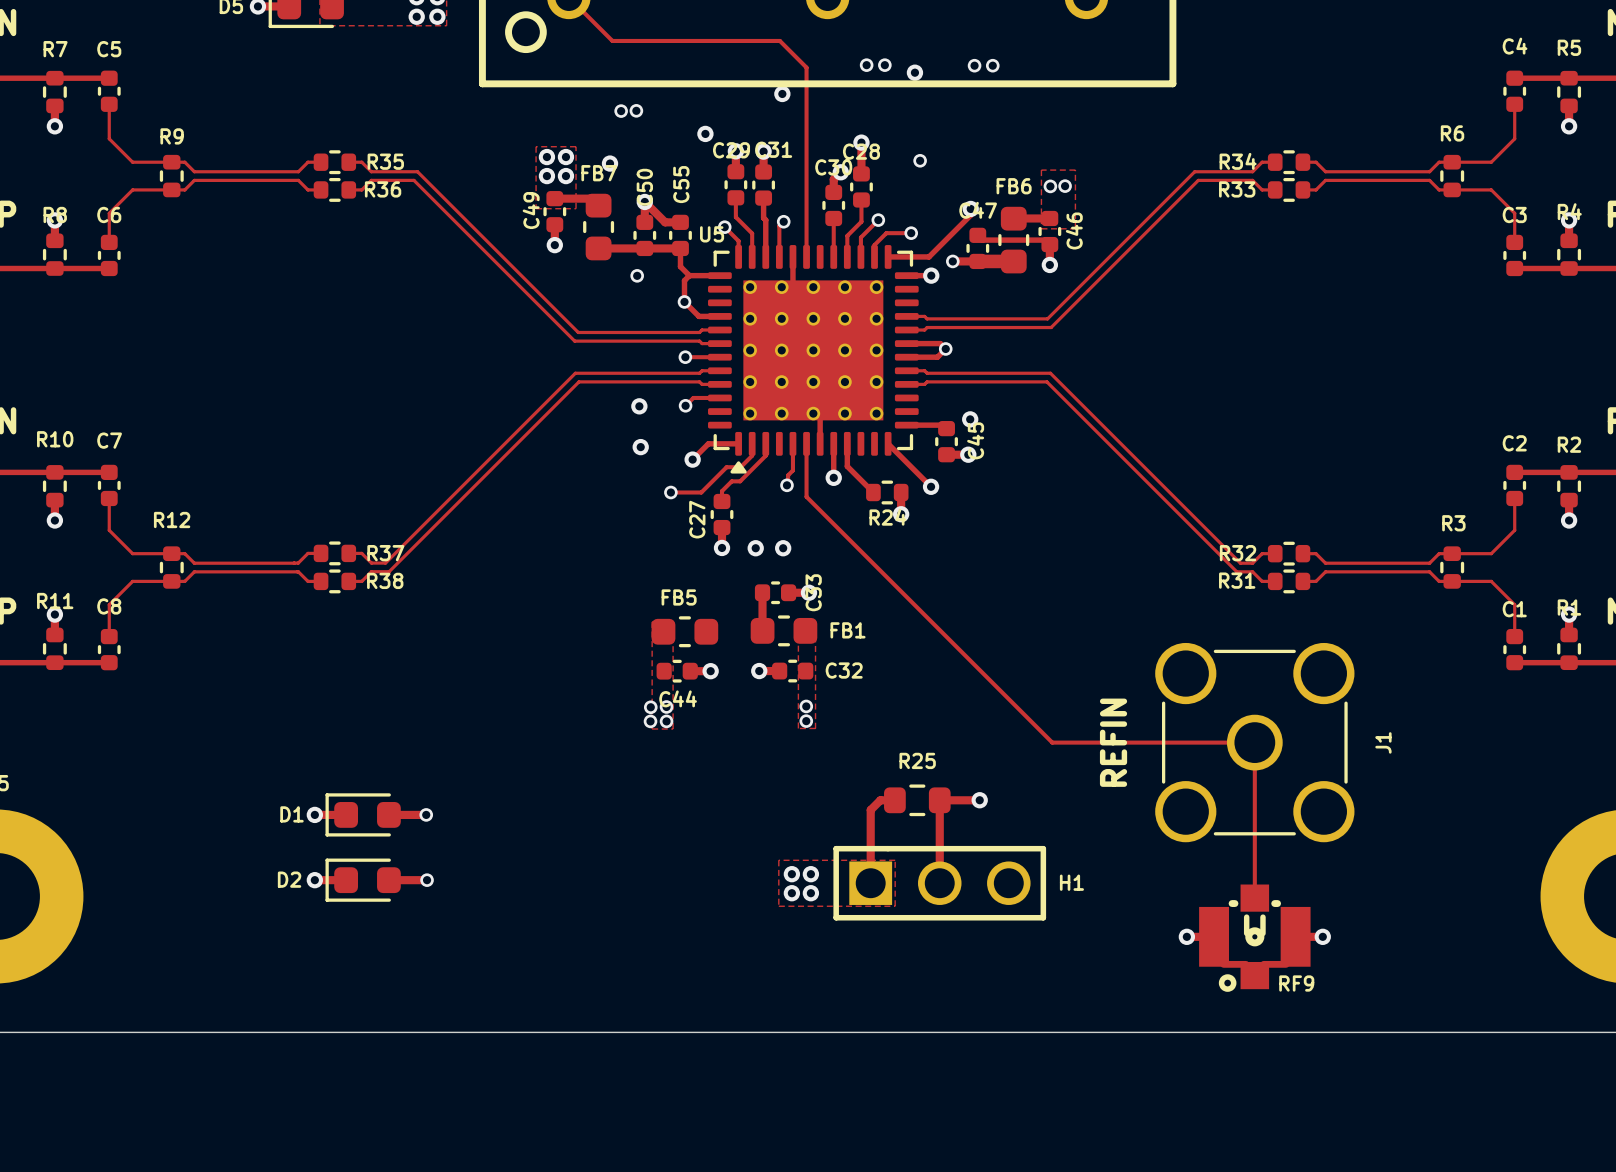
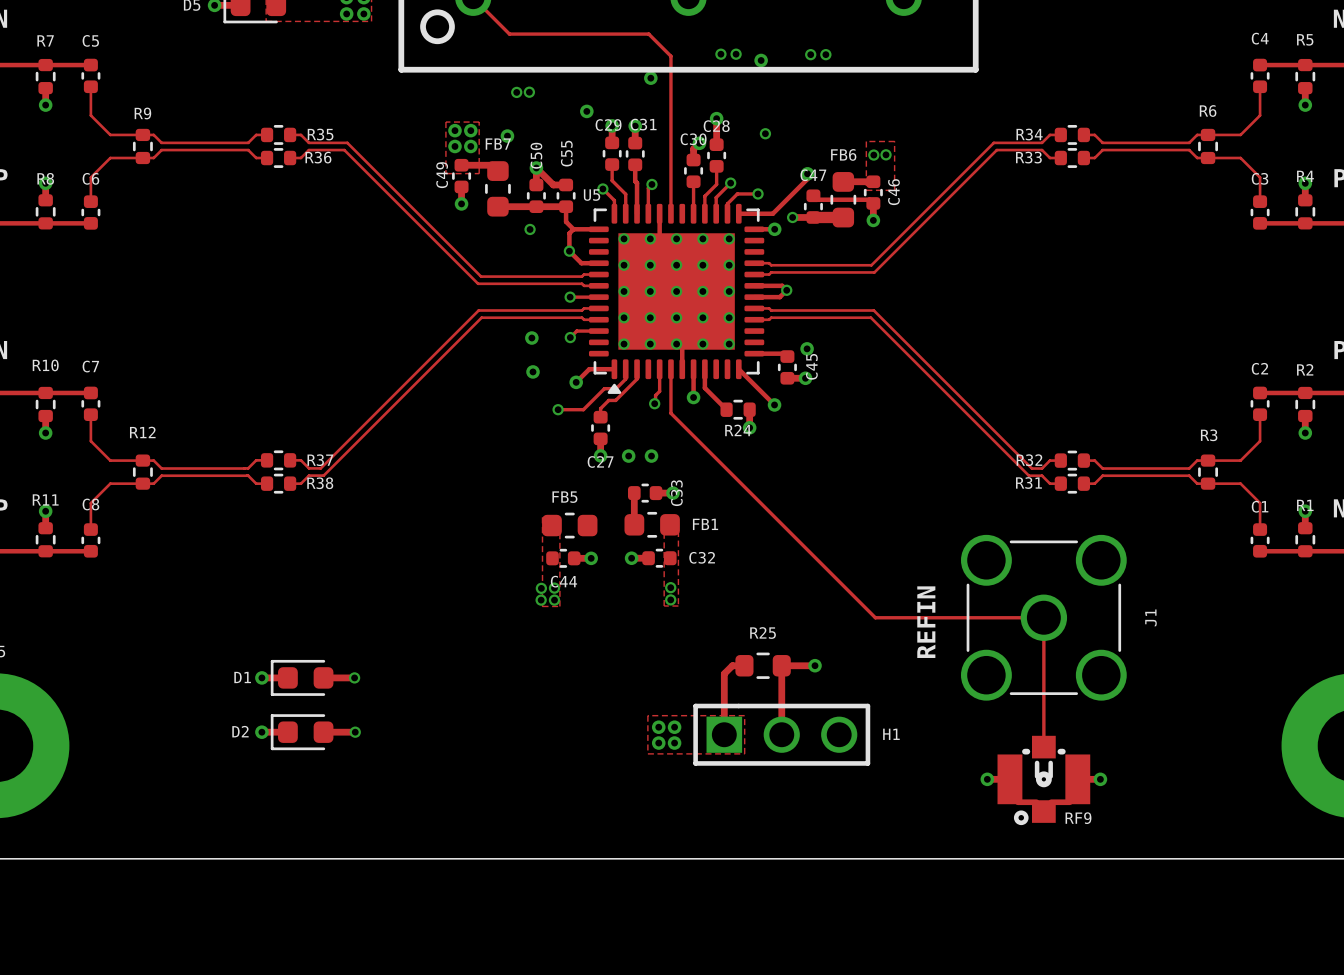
C27 name rotation: 0° (697, 519) -> 90° clockwise (600, 461)

